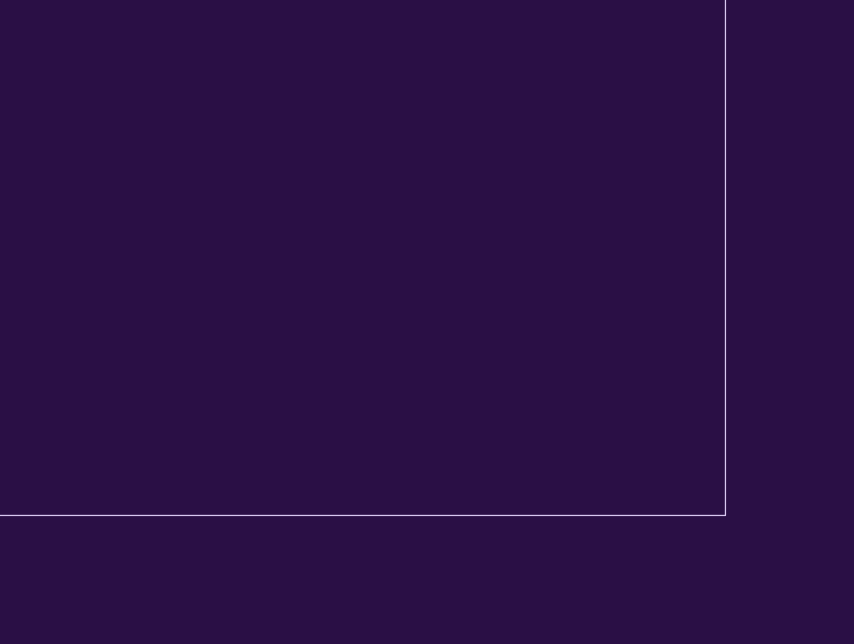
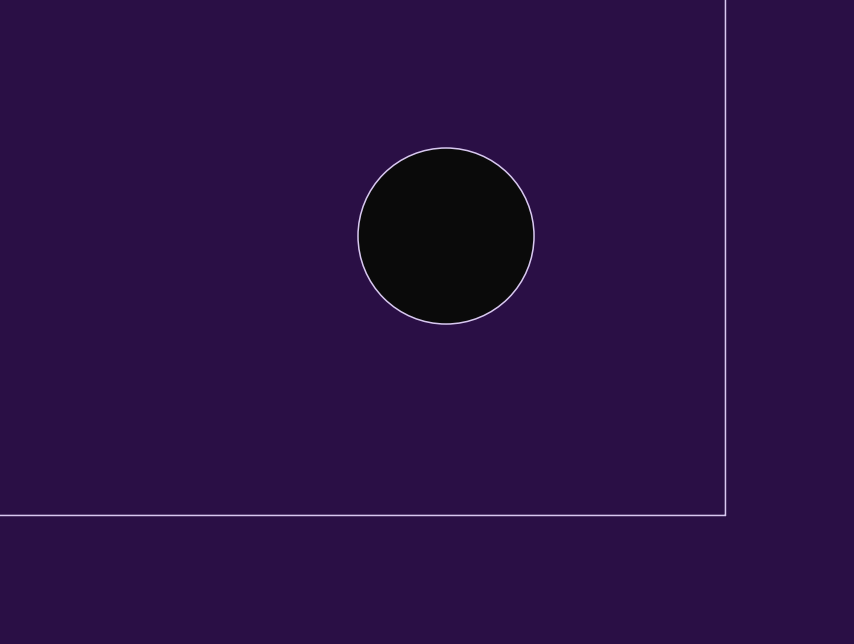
hole: none -> (446, 236)

